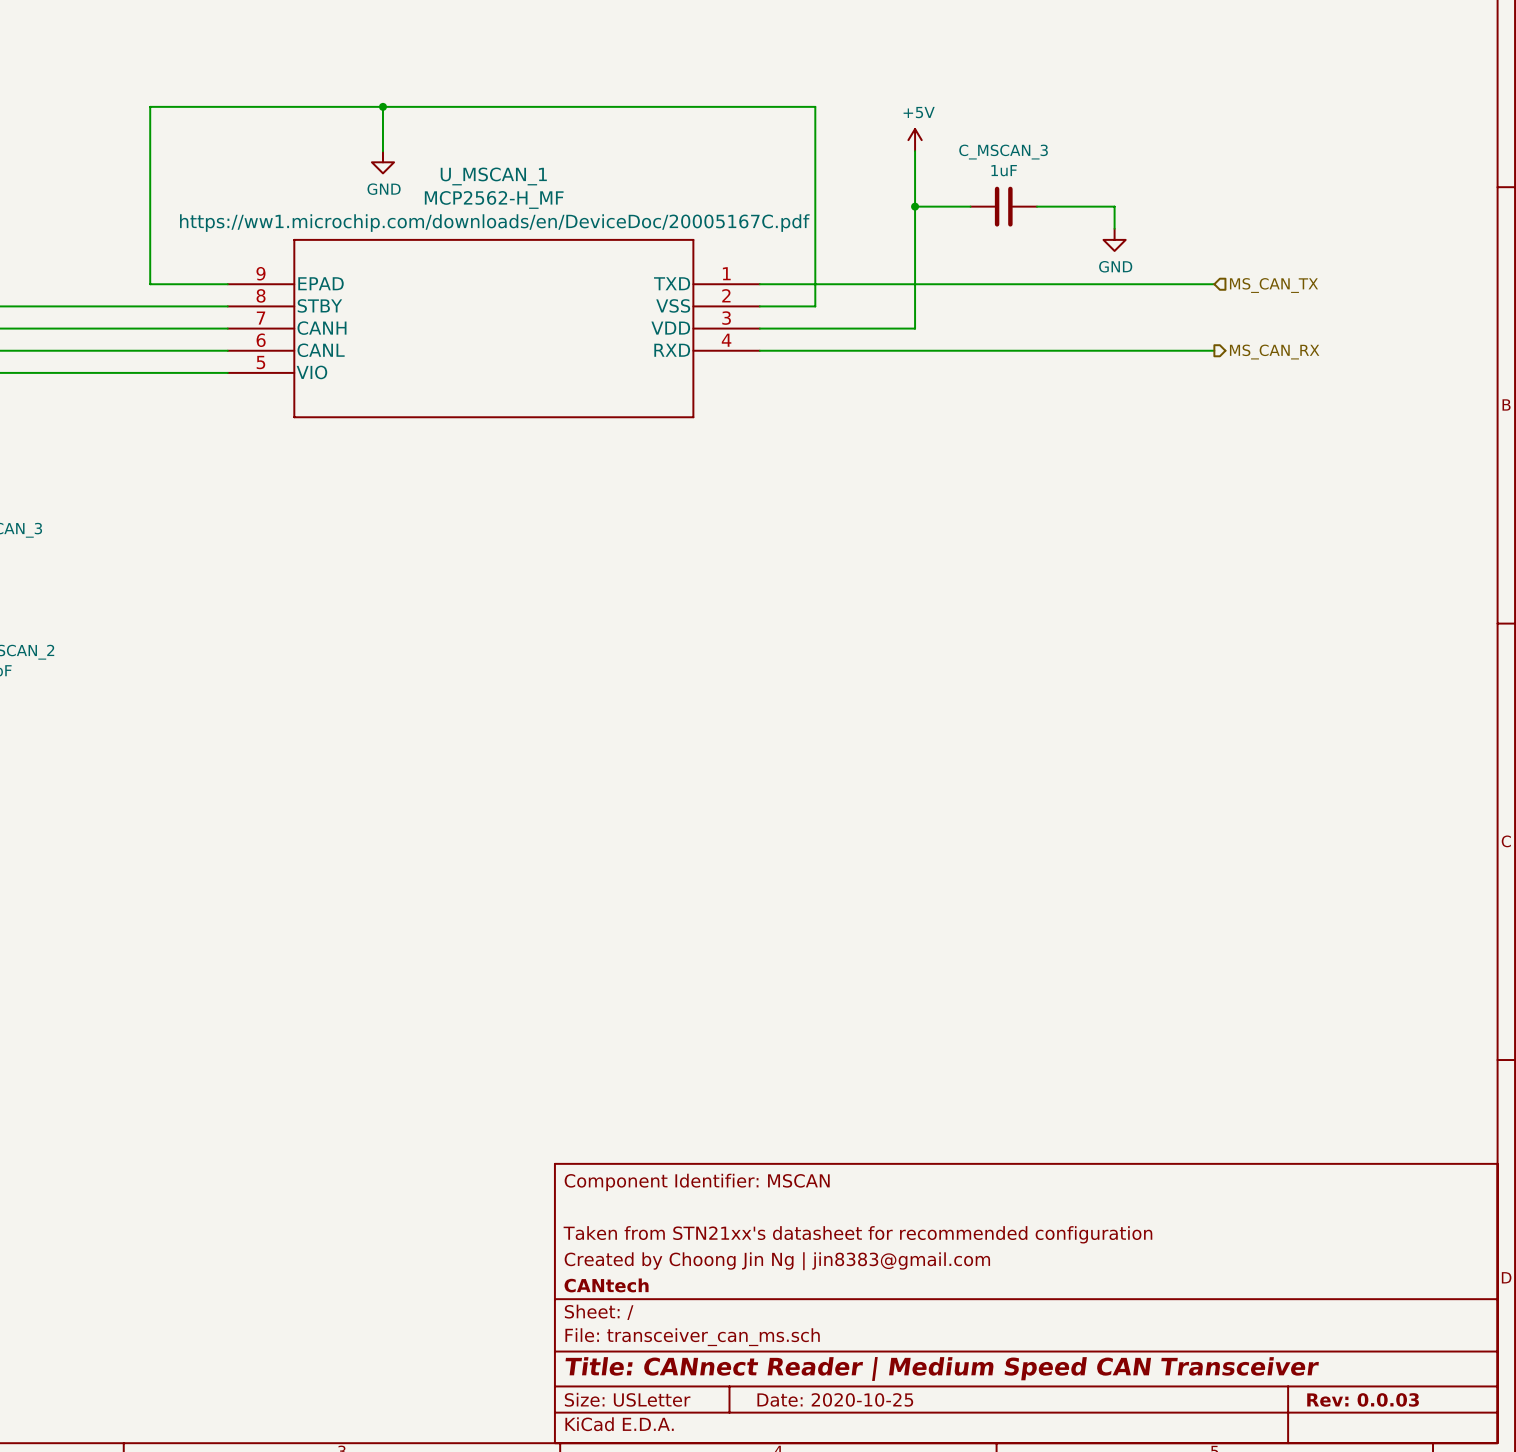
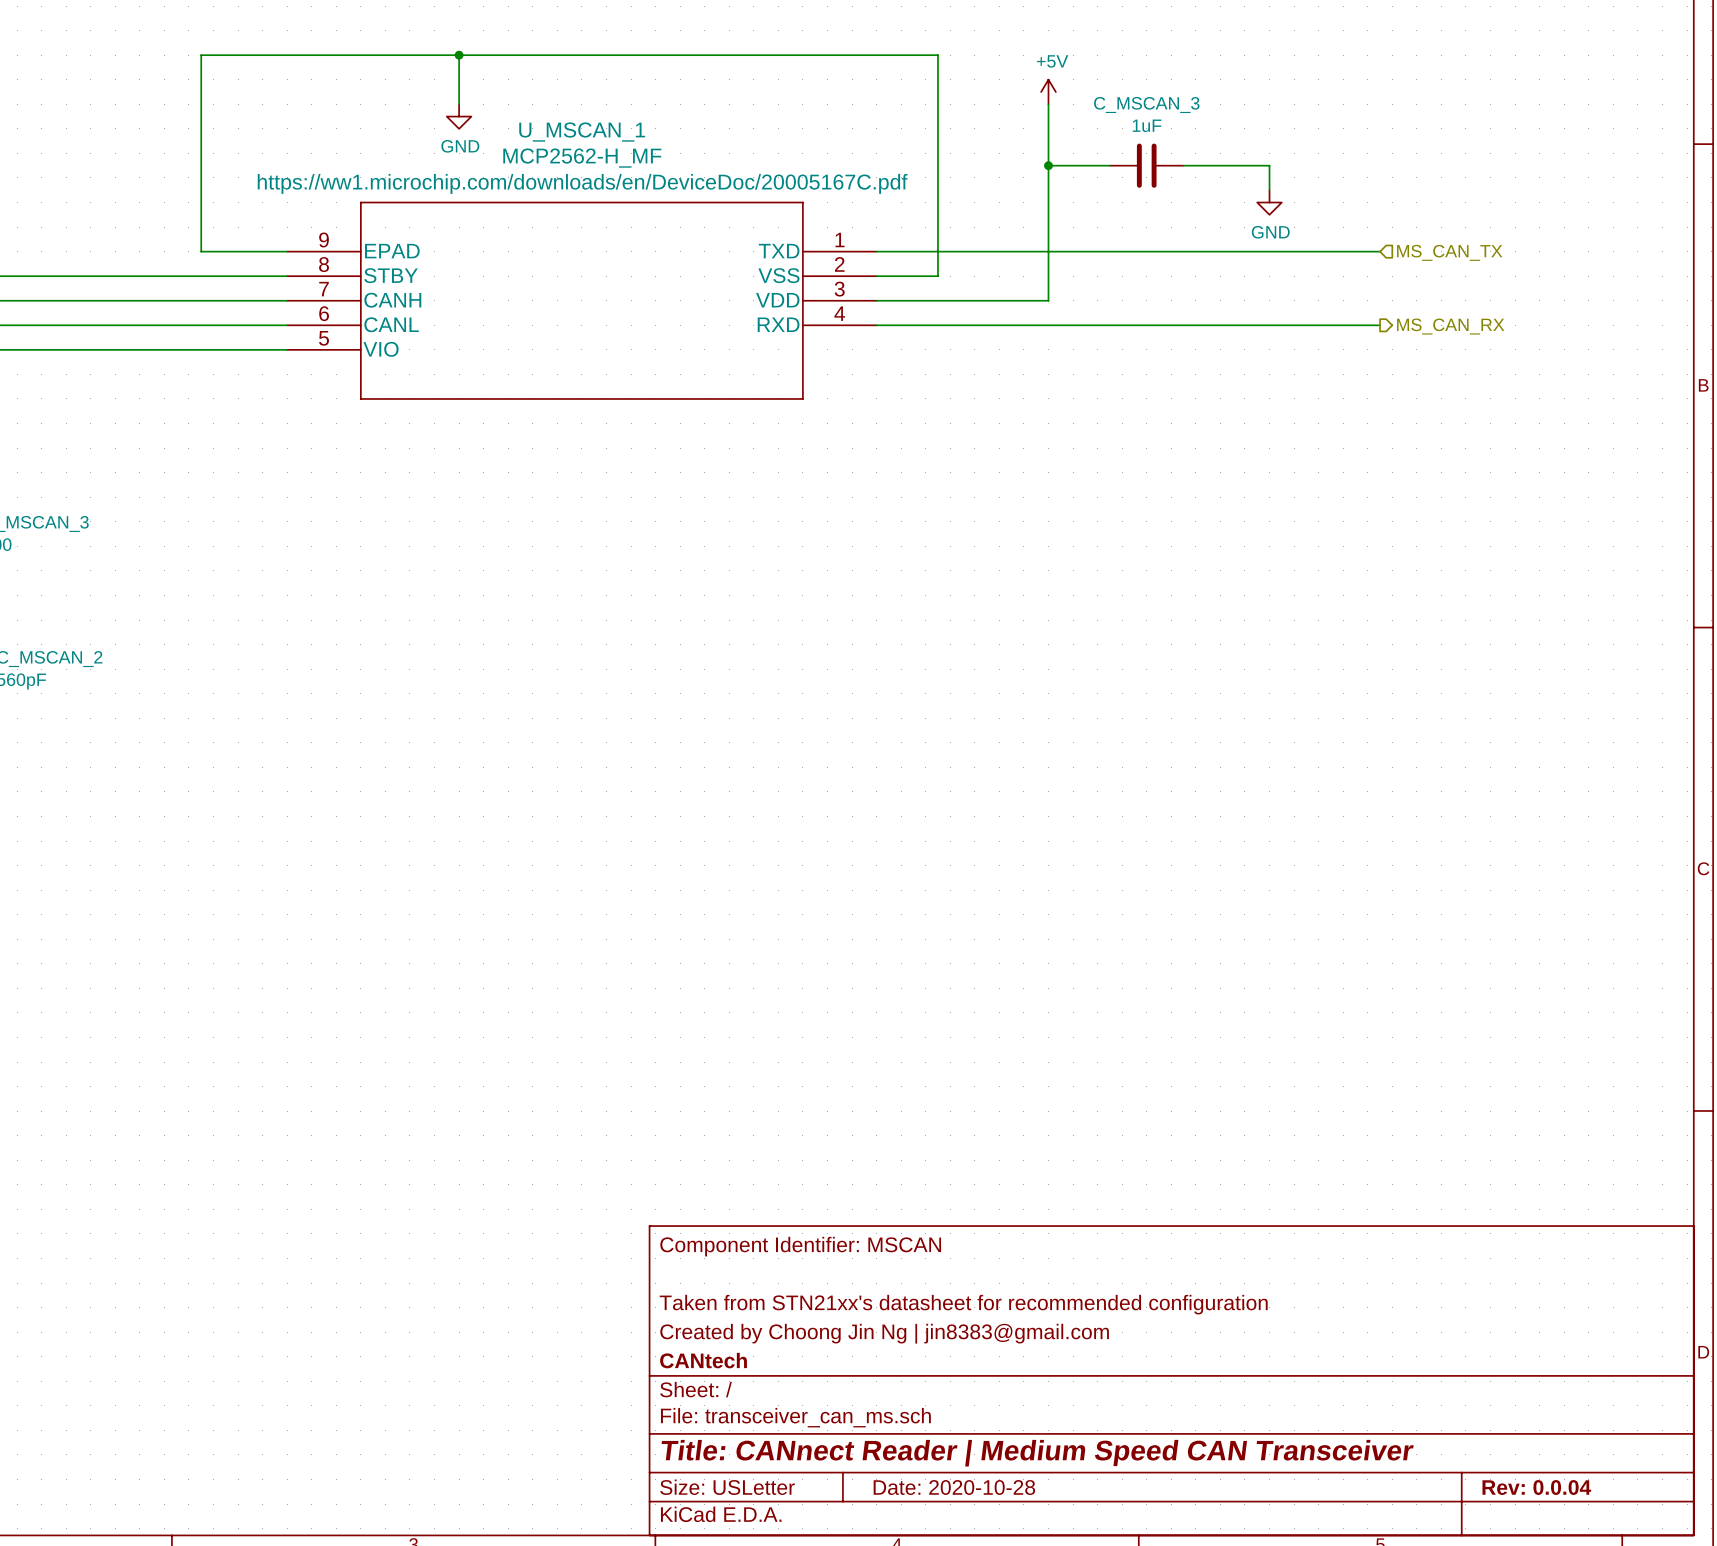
title block: Date: 2020-10-25 (835, 1399) -> Date: 2020-10-28 (954, 1487)
title block: Rev: 0.0.03 (1363, 1399) -> Rev: 0.0.04 (1536, 1487)

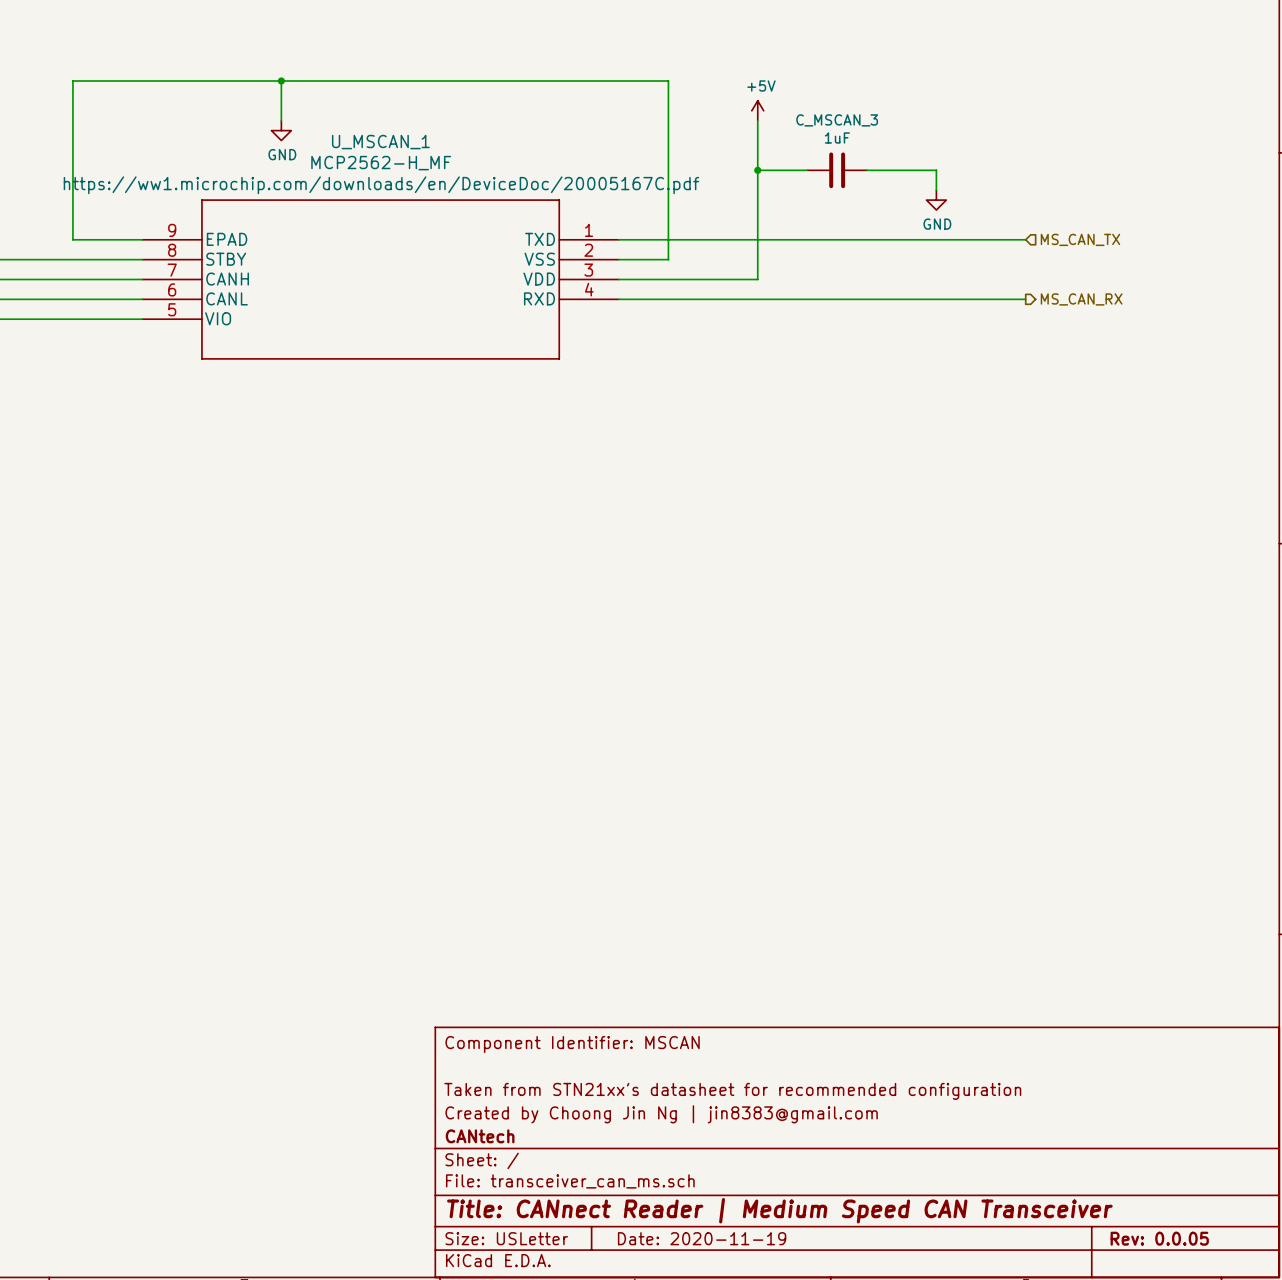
title block: Date: 2020-10-28 (954, 1487) -> Date: 2020-11-19 (702, 1238)
title block: Rev: 0.0.04 (1536, 1487) -> Rev: 0.0.05 (1159, 1238)

